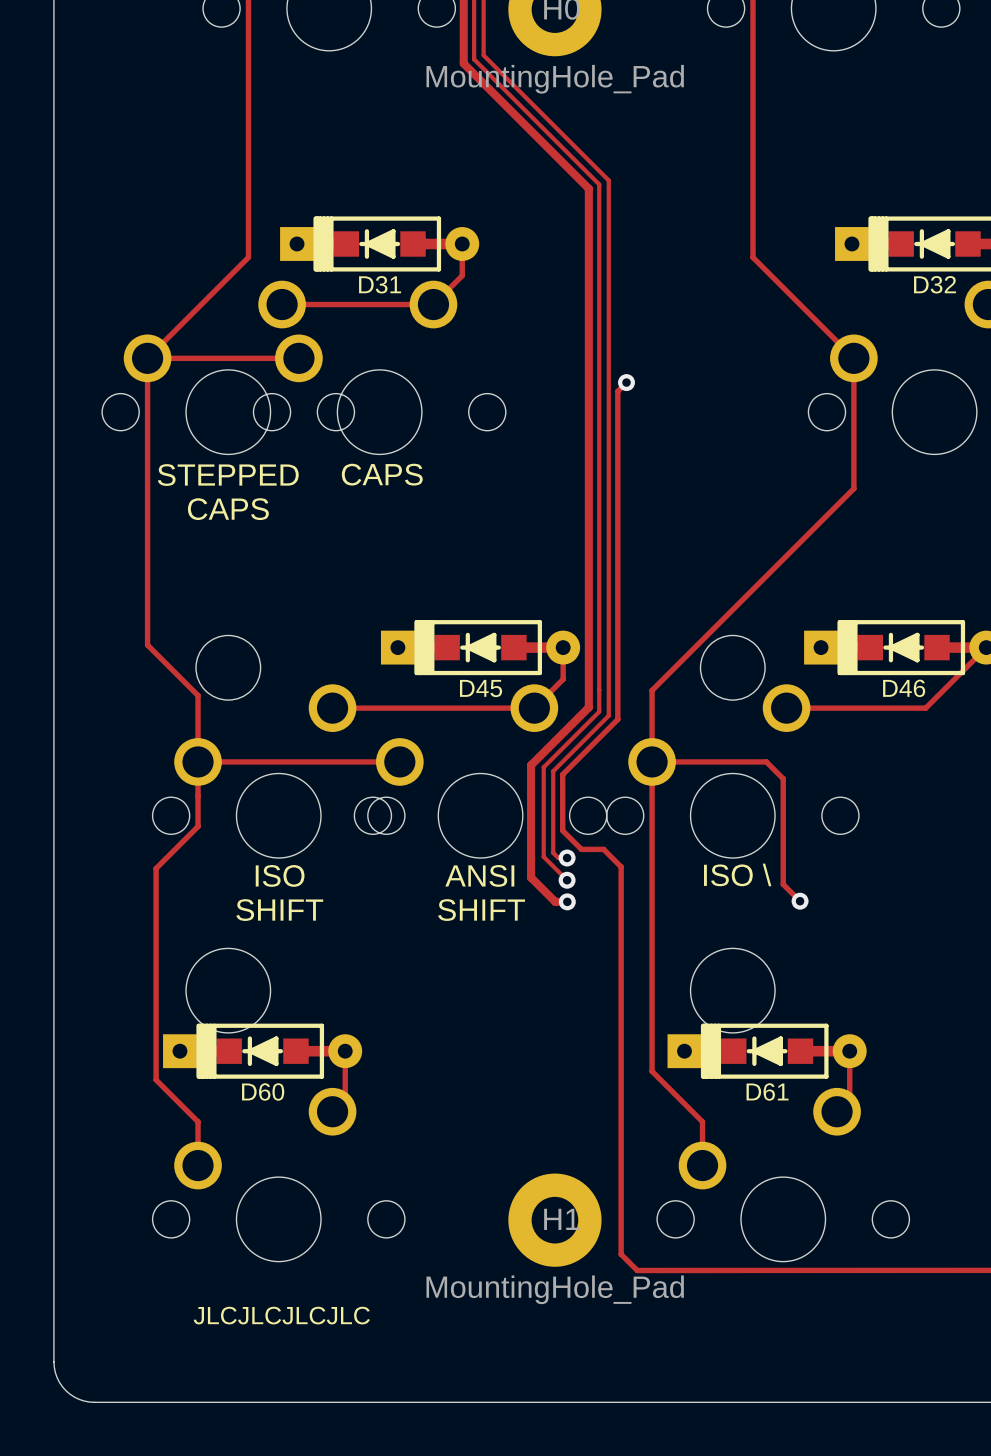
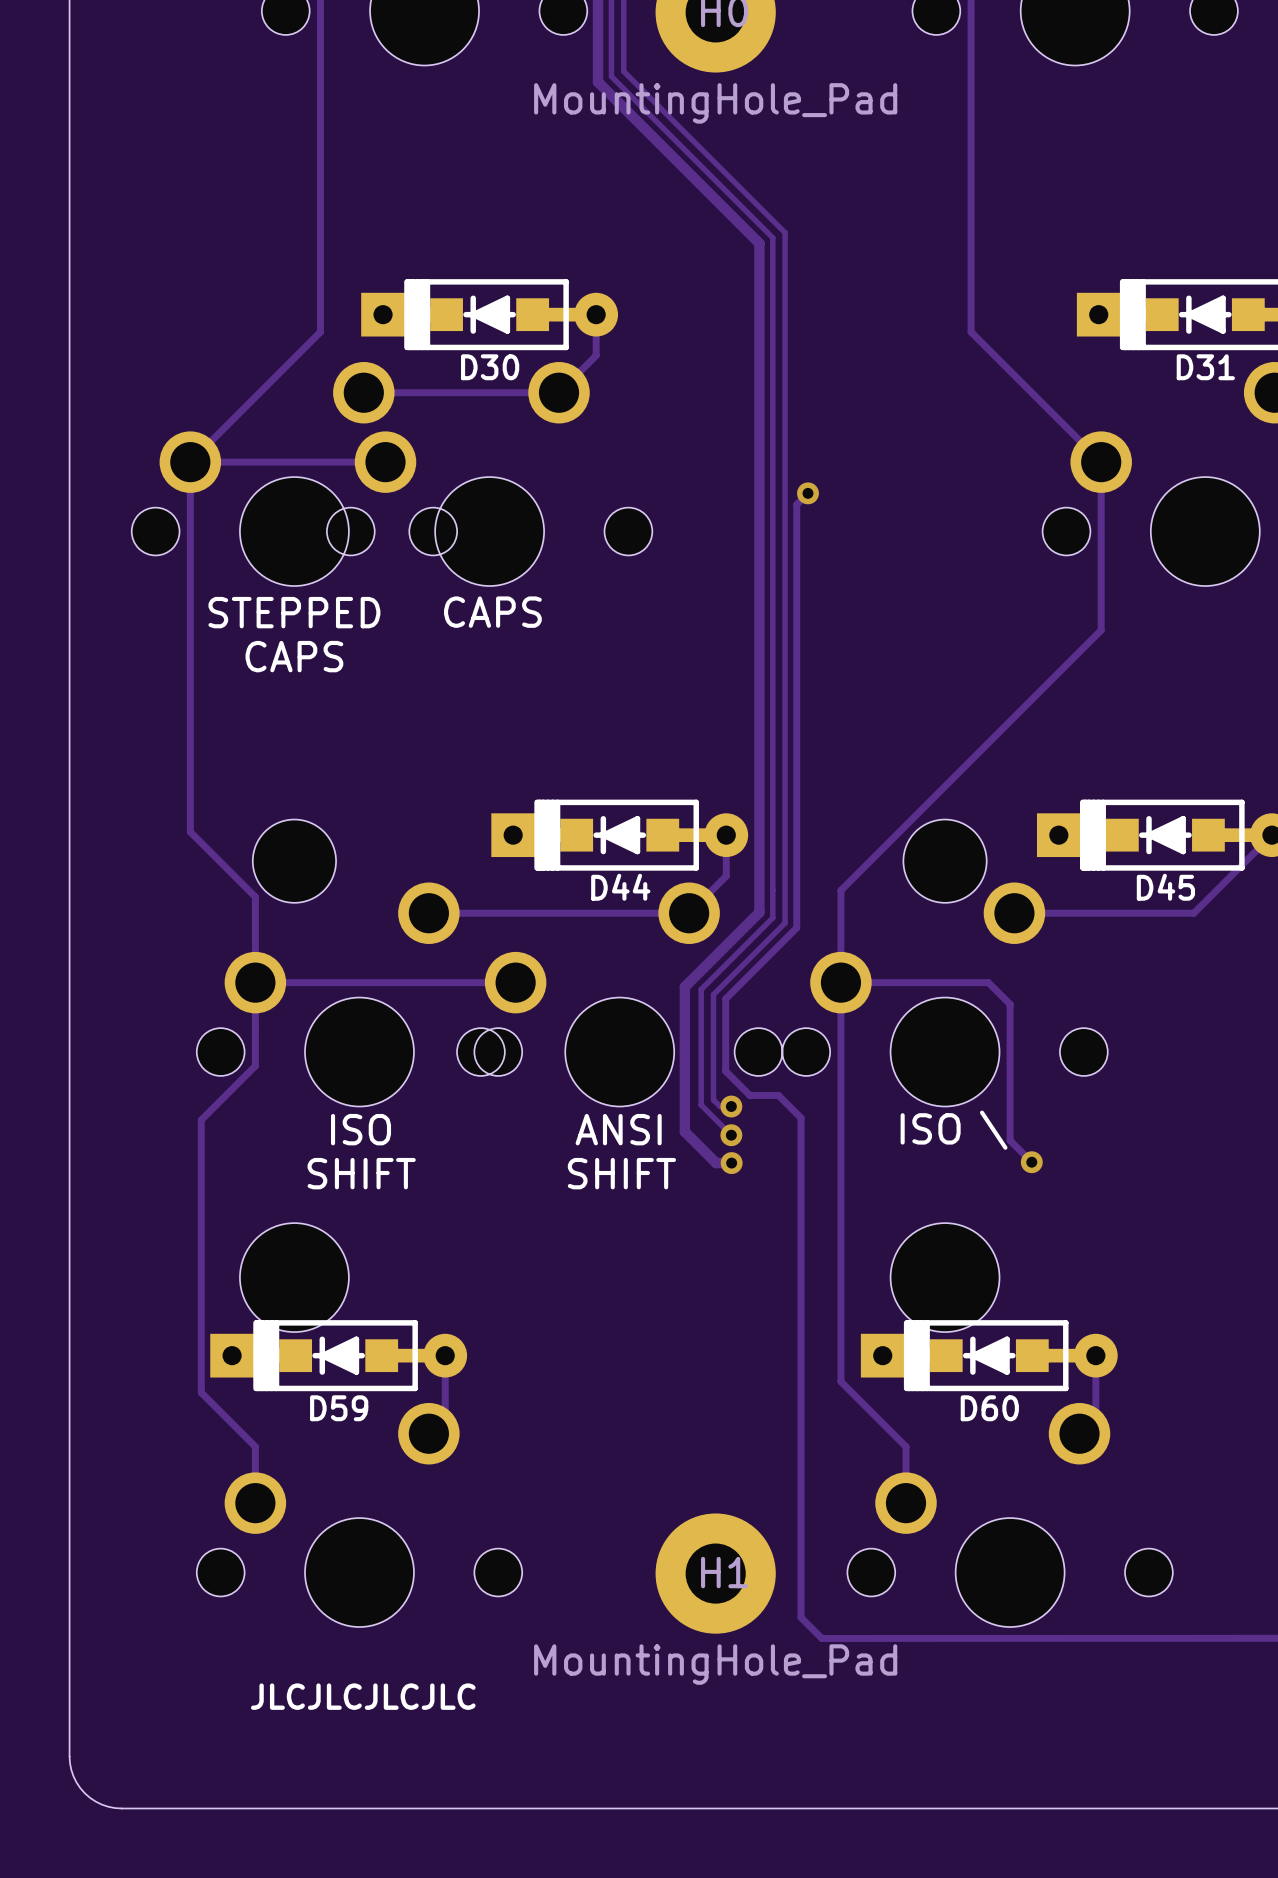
D31 name: D31 (380, 284) -> D30 (490, 367)
D32 name: D32 (934, 284) -> D31 (1205, 367)
D45 name: D45 (481, 688) -> D44 (620, 887)
D46 name: D46 (904, 688) -> D45 (1165, 887)
D60 name: D60 (263, 1091) -> D59 (339, 1408)
D61 name: D61 (767, 1091) -> D60 (989, 1408)

